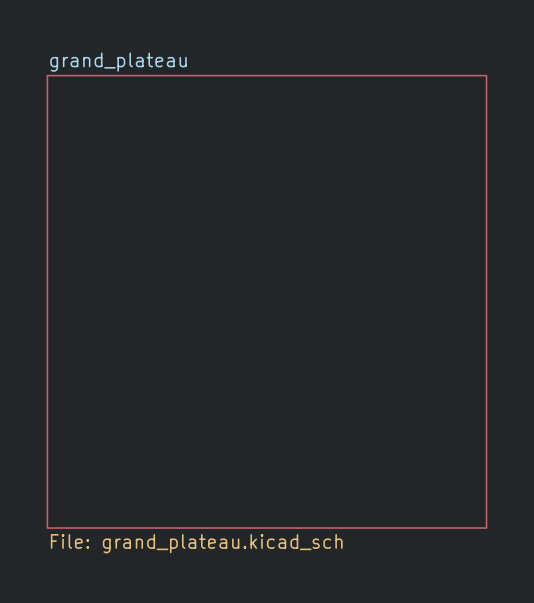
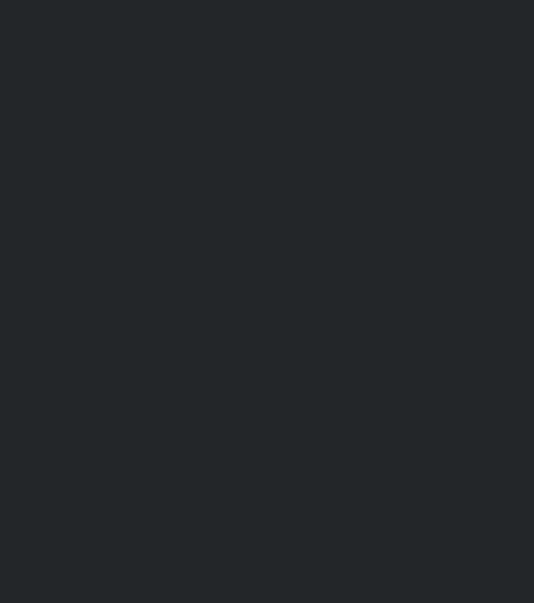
sheet grand_plateau: File: grand_plateau.kicad_sch (266, 301) -> none

